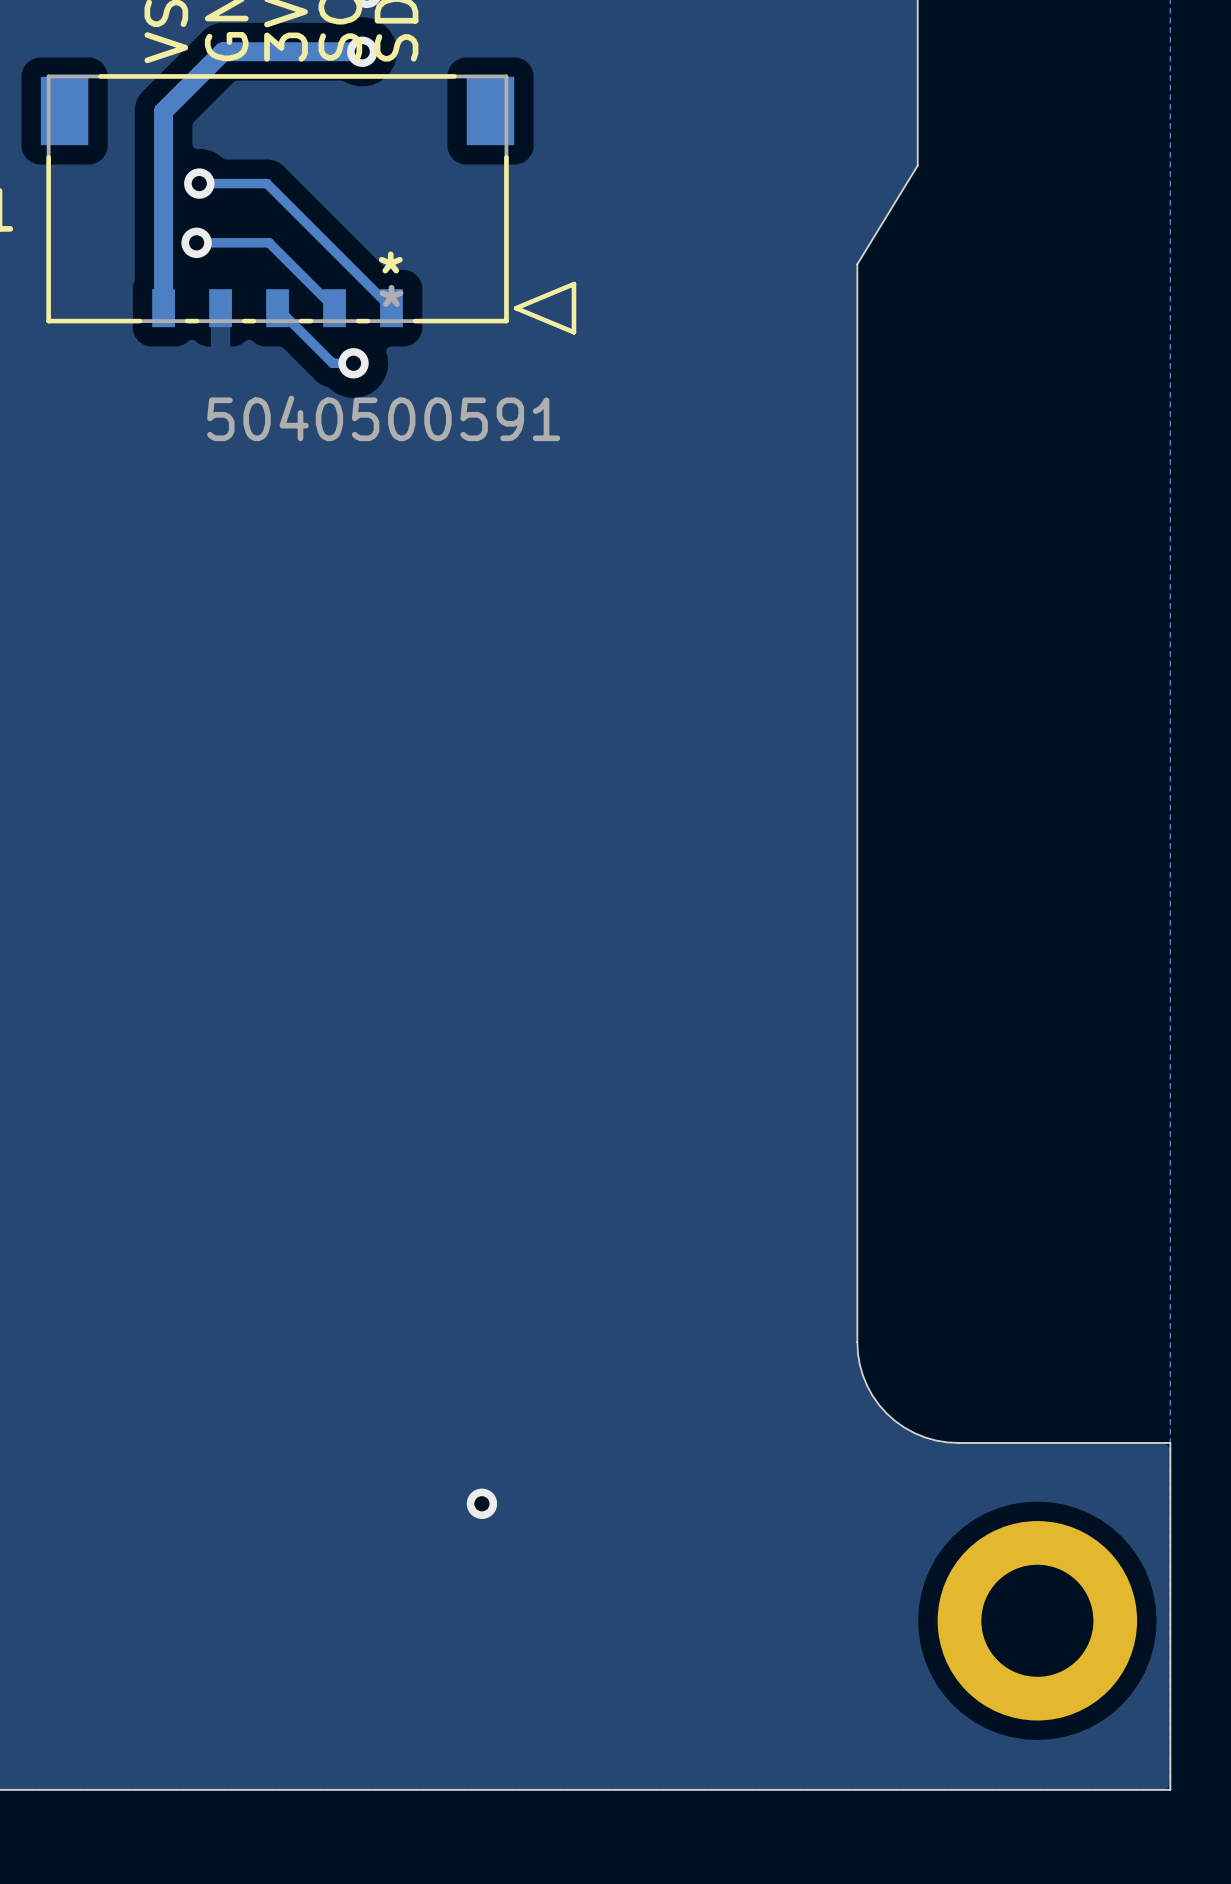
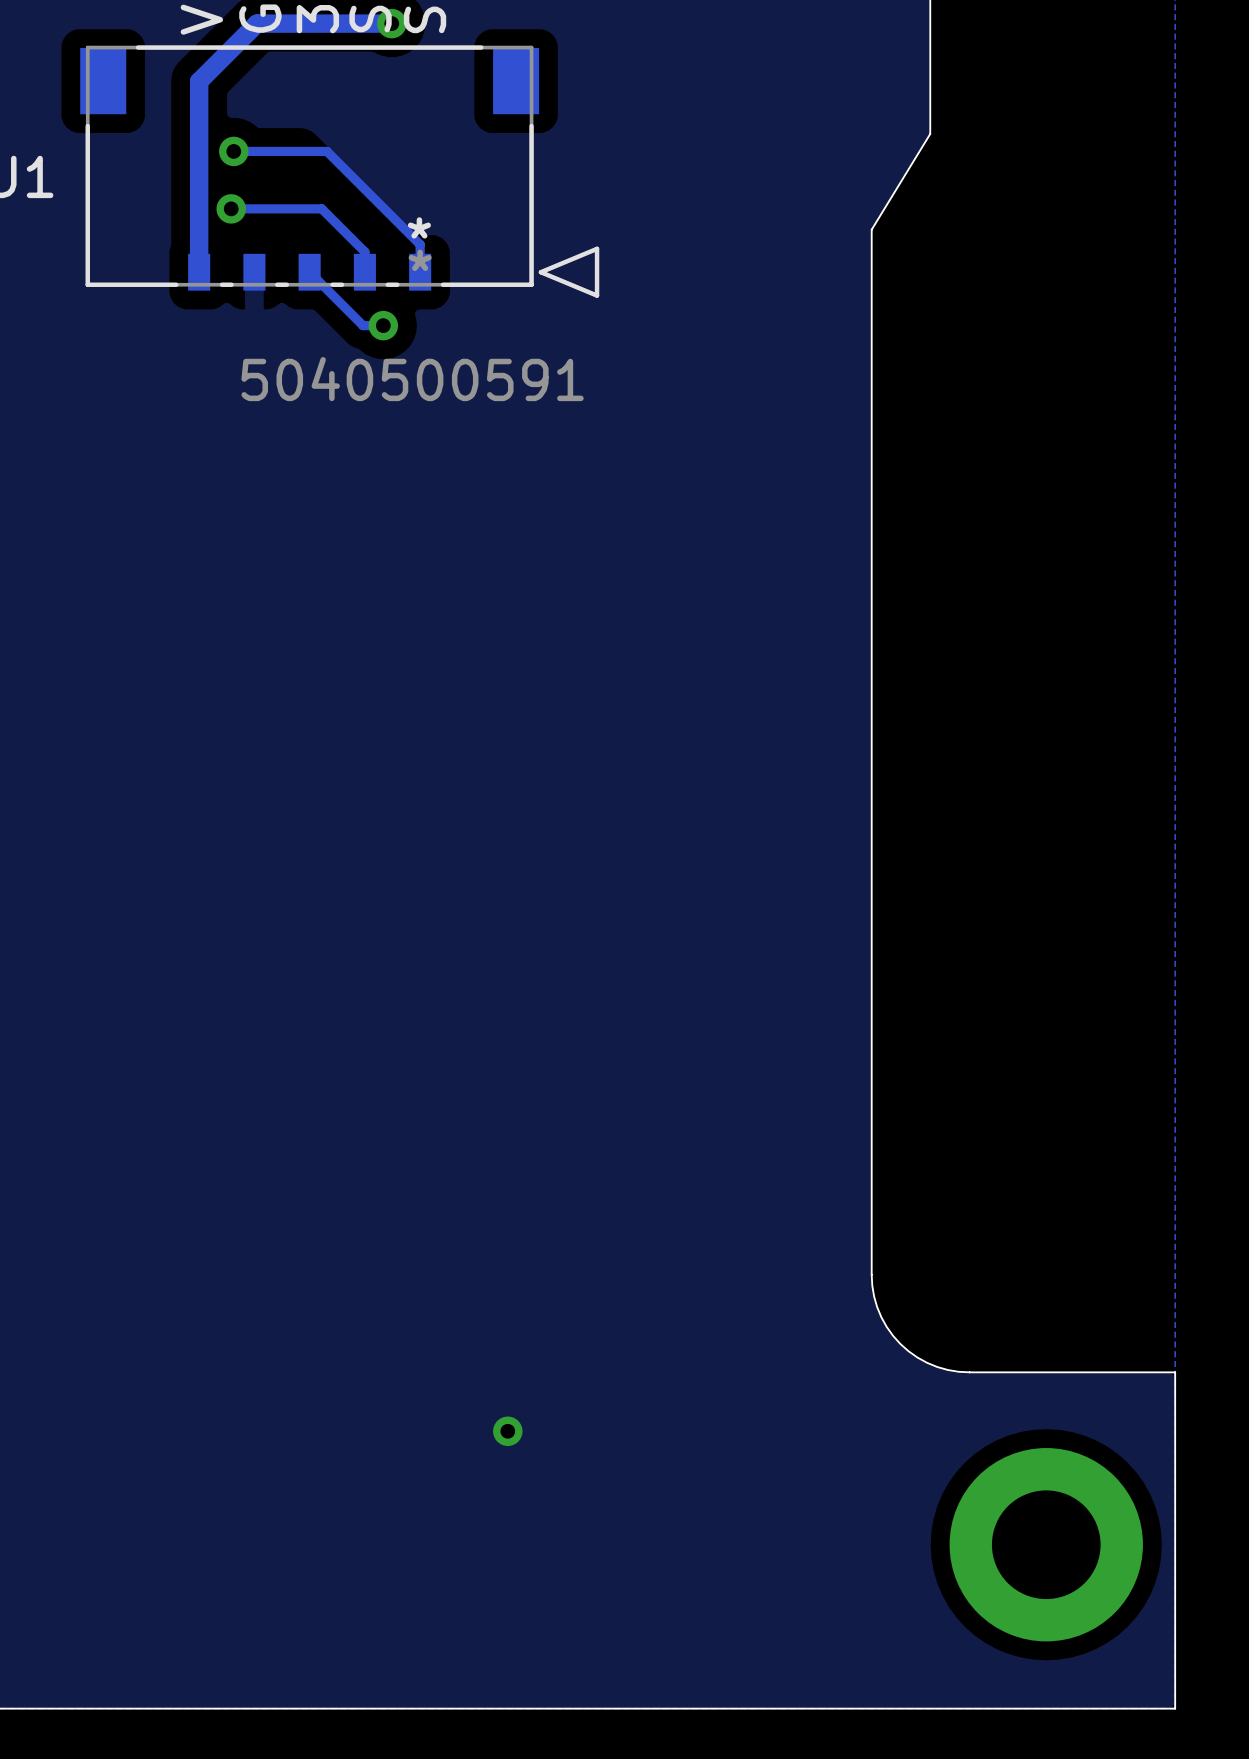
track: (266, 183) (391, 308) -> (299, 151) (326, 151) (420, 244) (420, 272)
track: (269, 242) (334, 308) -> (301, 208) (321, 208) (364, 251) (364, 272)

